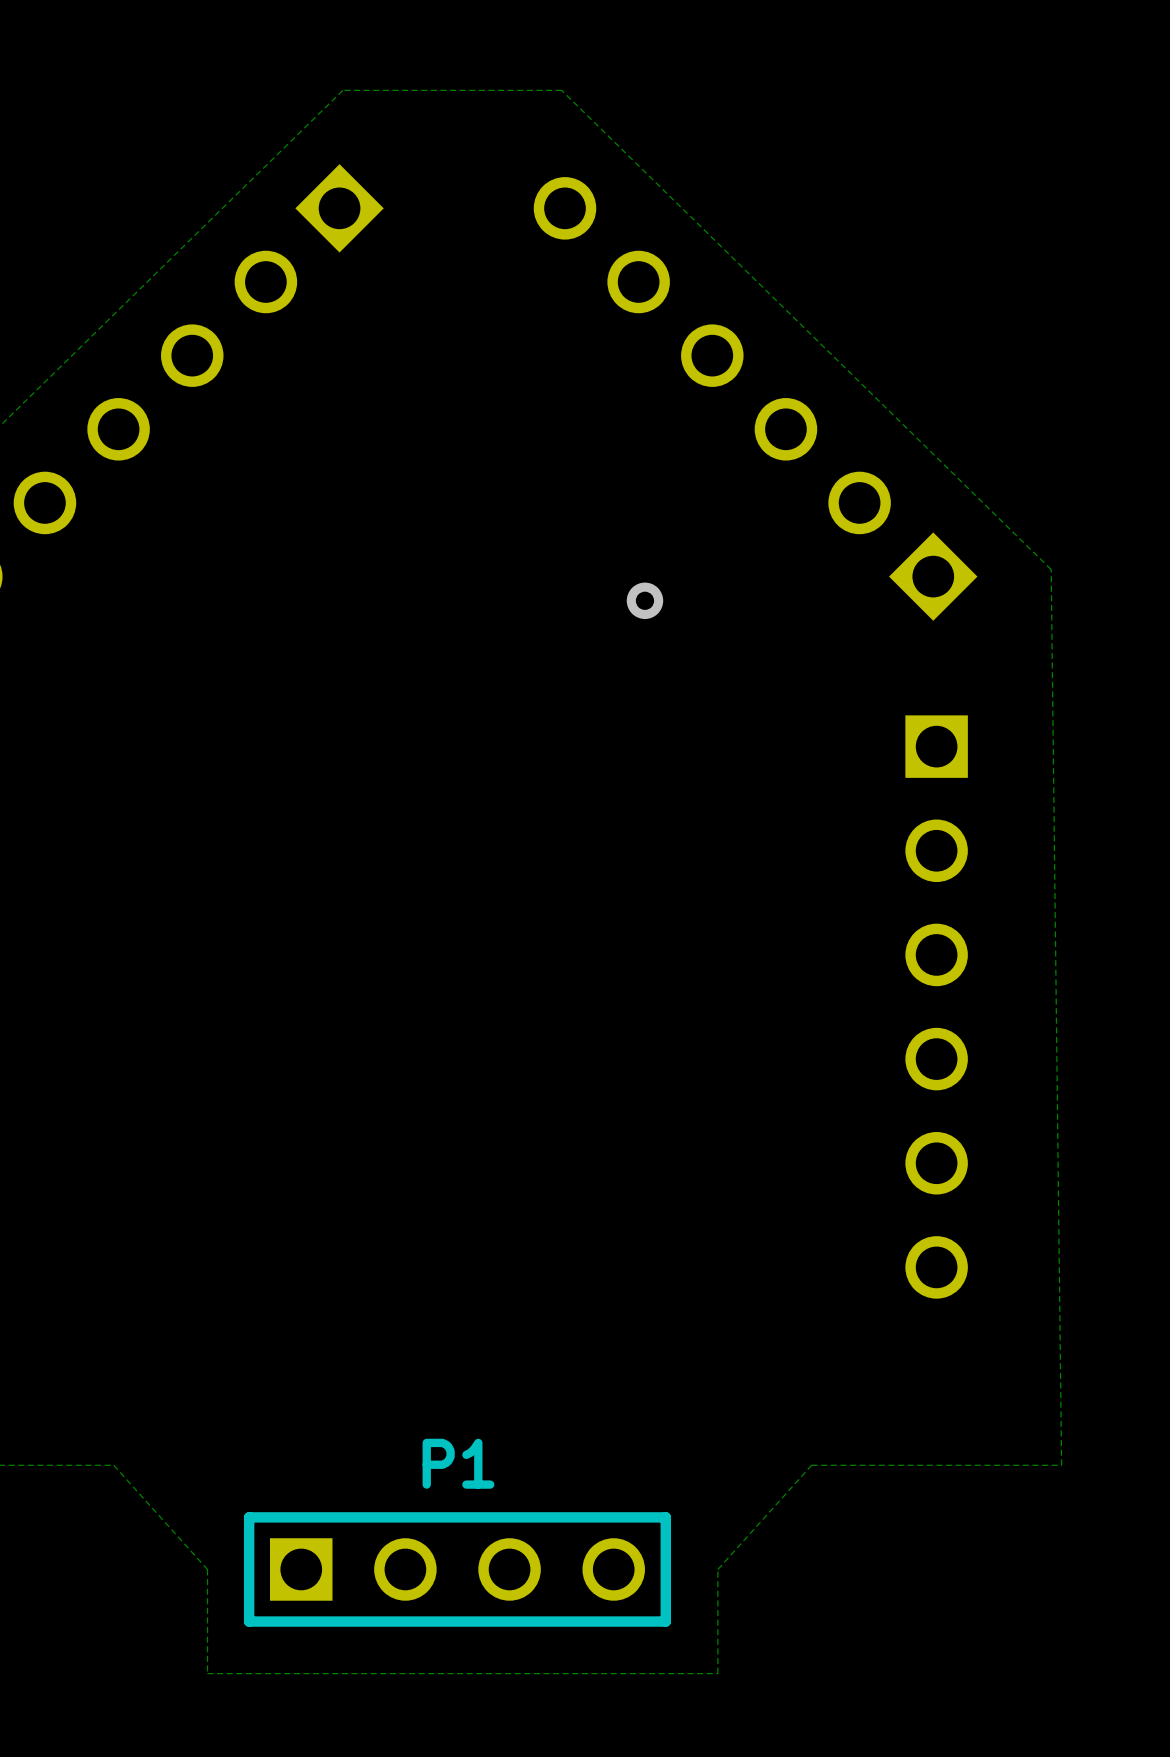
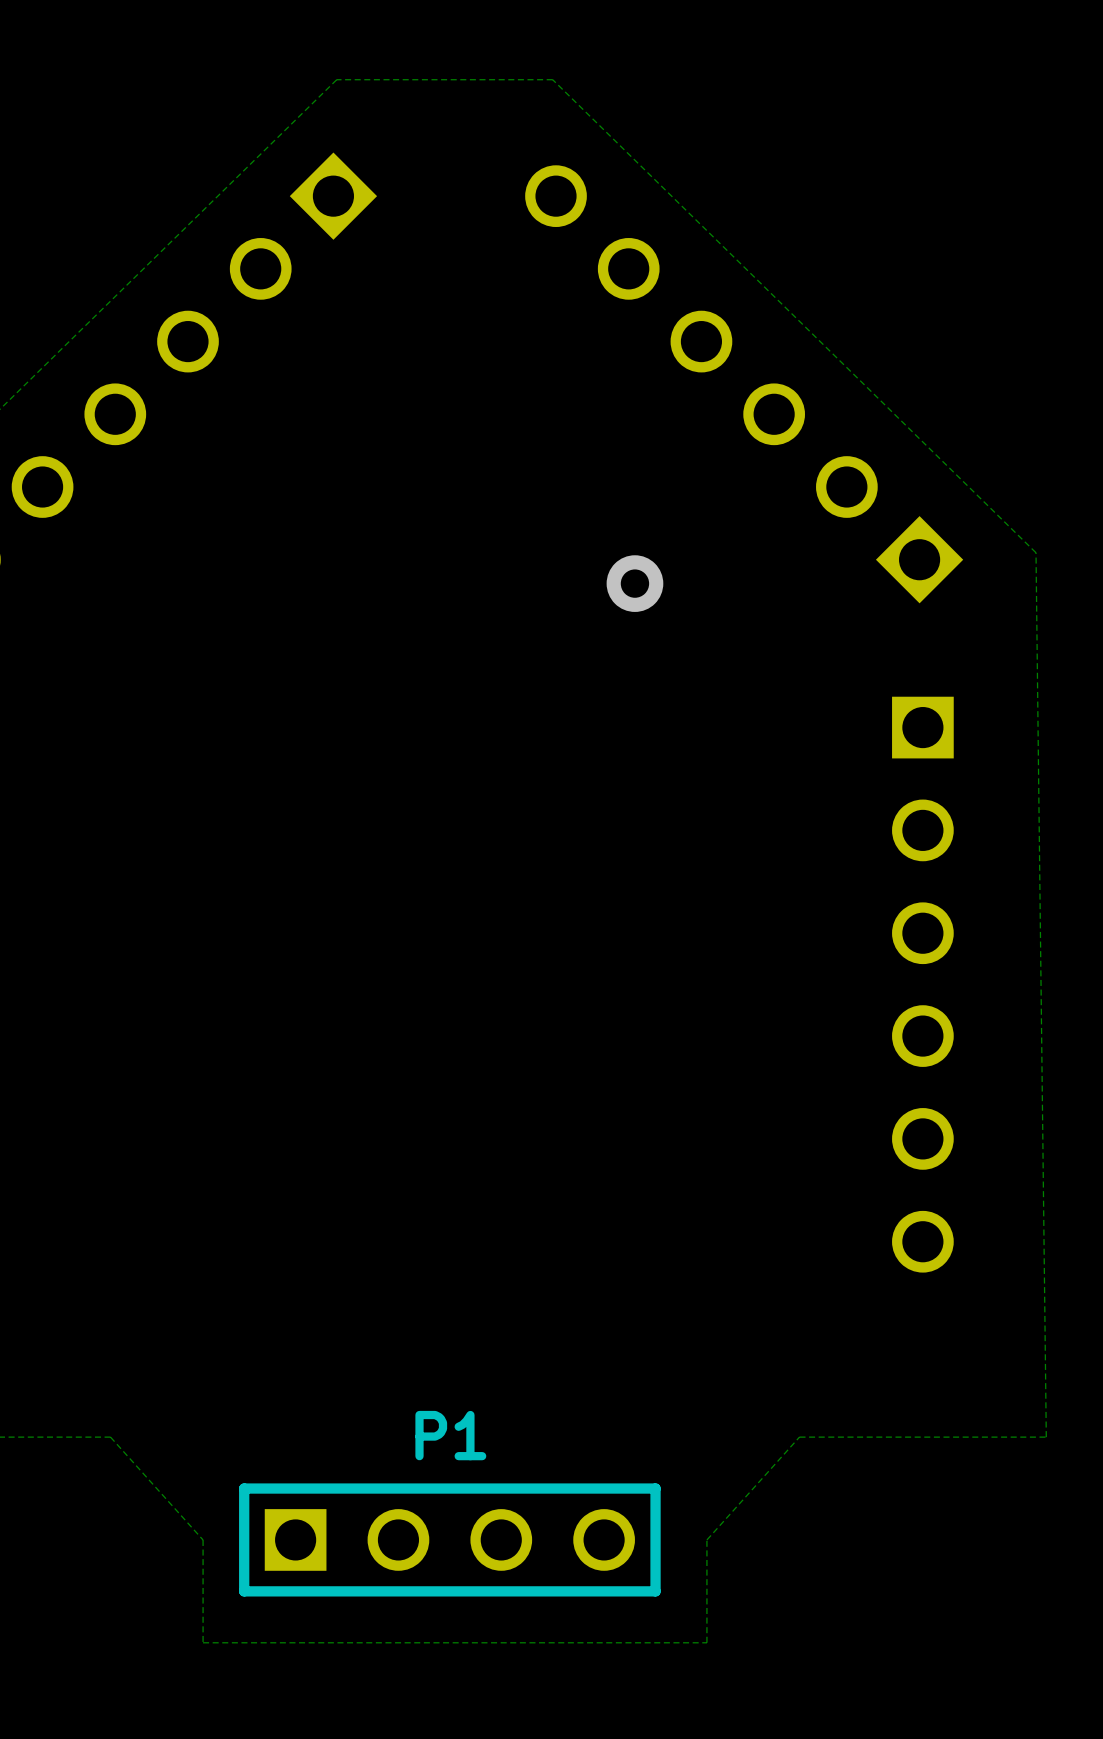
via size: [626, 582, 664, 620] -> [606, 555, 664, 612]

